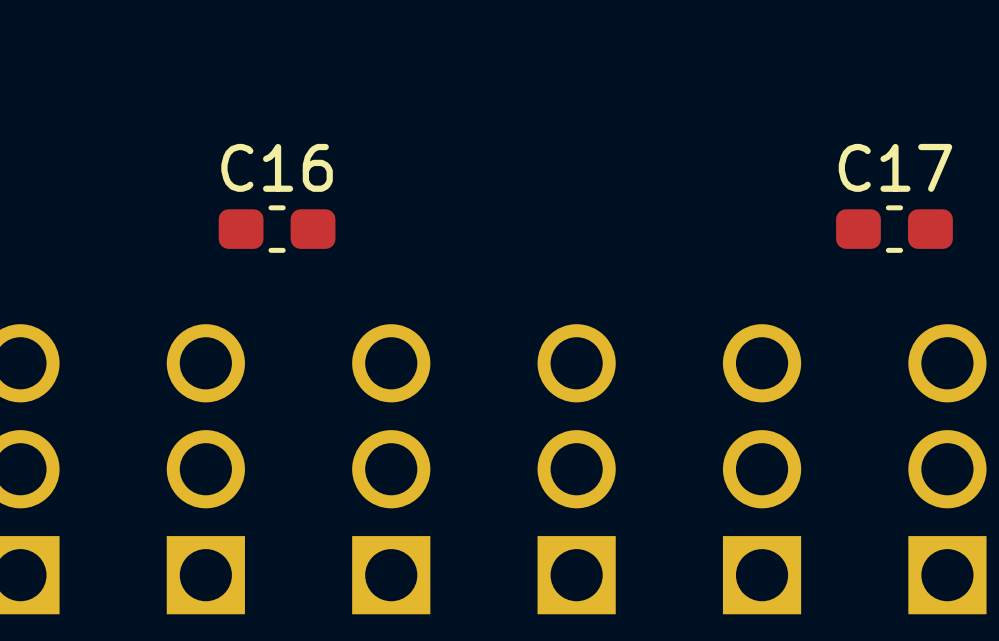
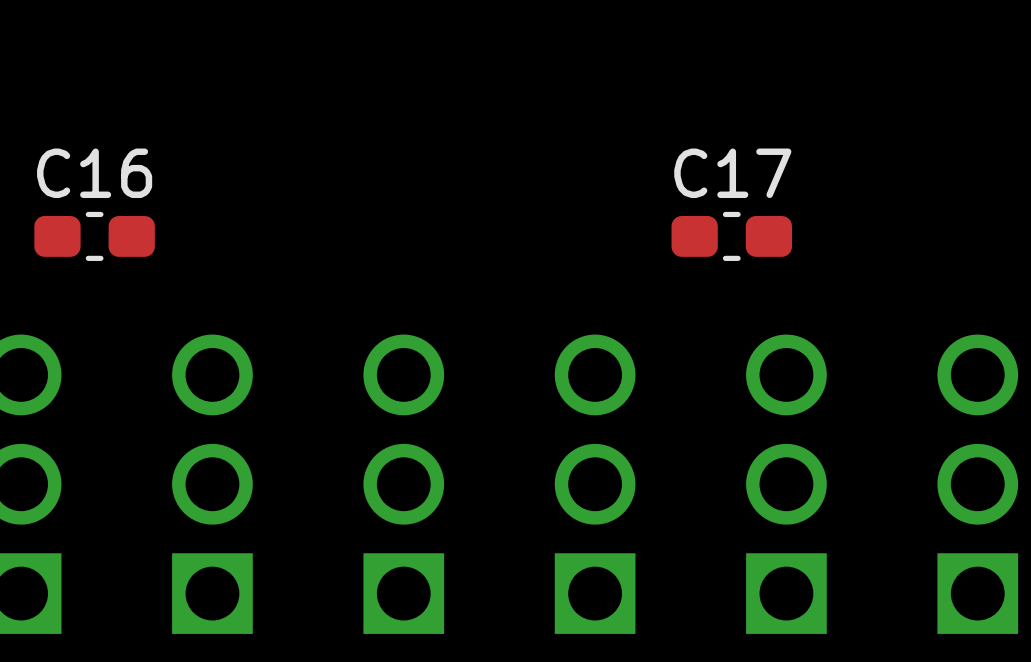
C16 position: (277, 229) -> (94, 236)
C17 position: (894, 229) -> (731, 236)

